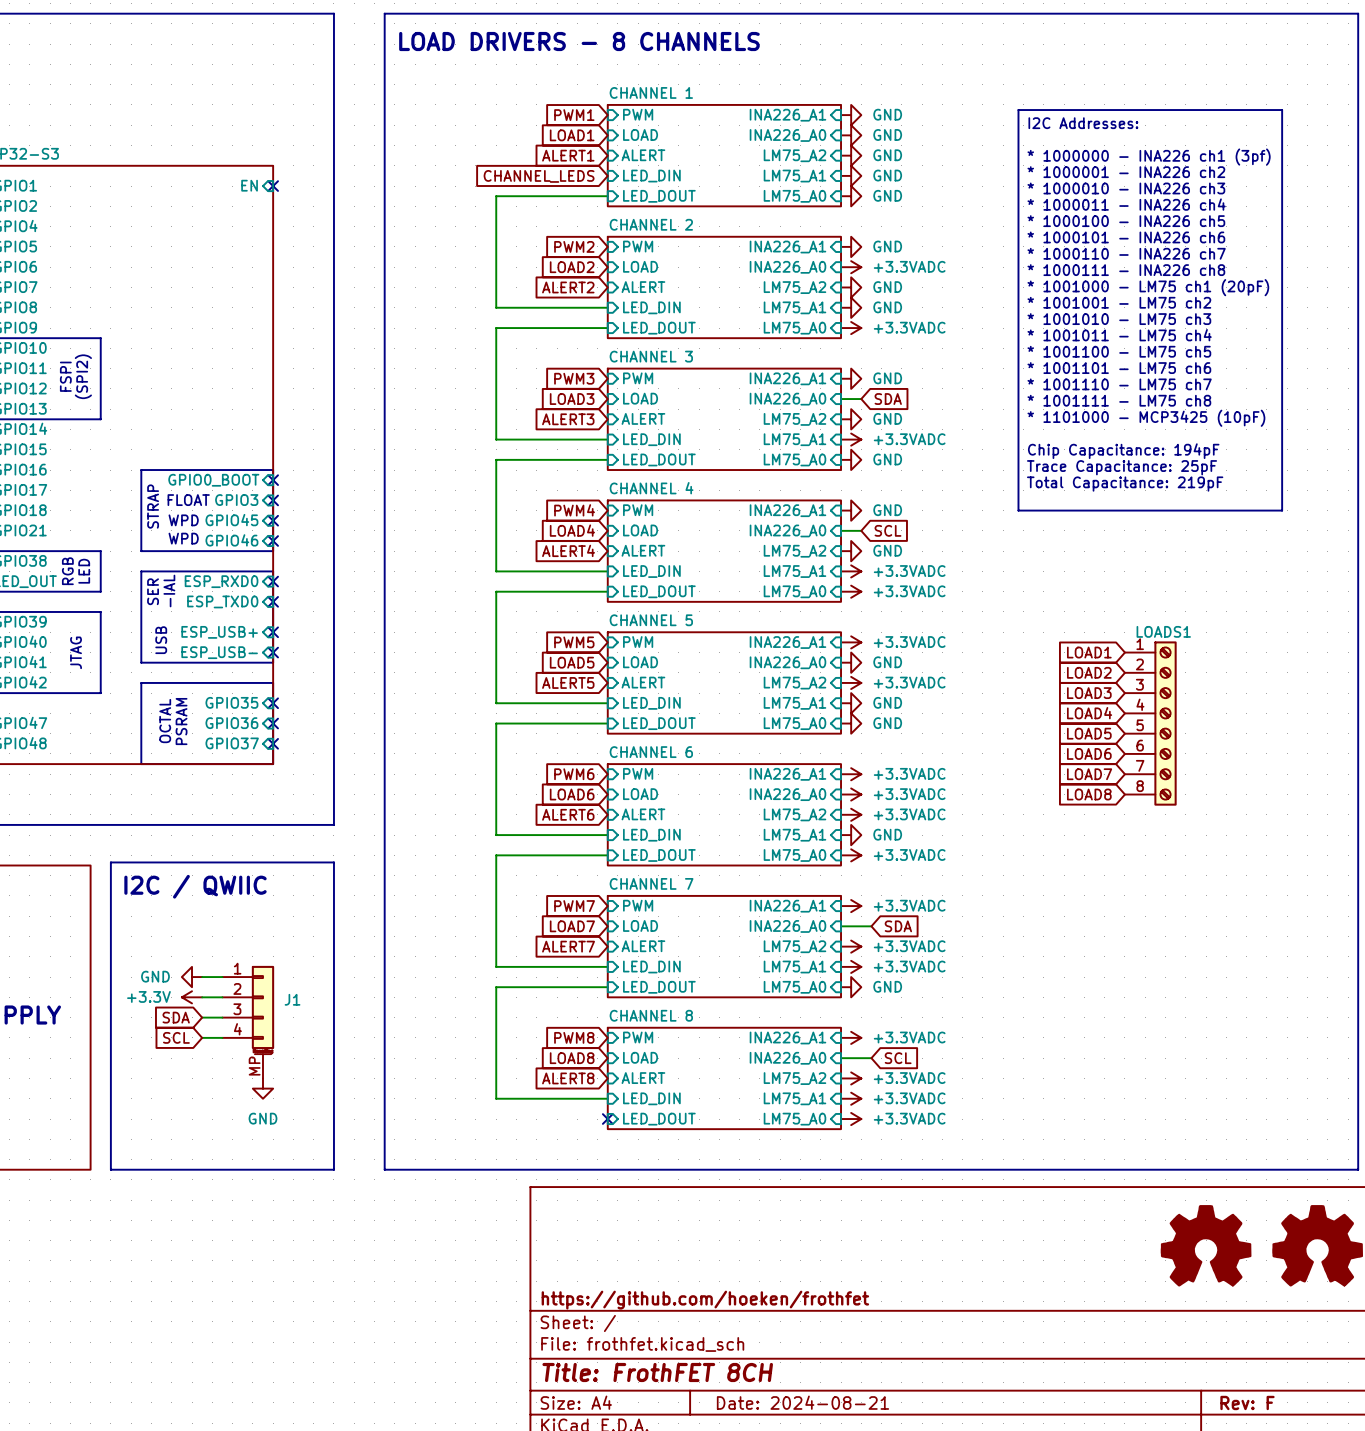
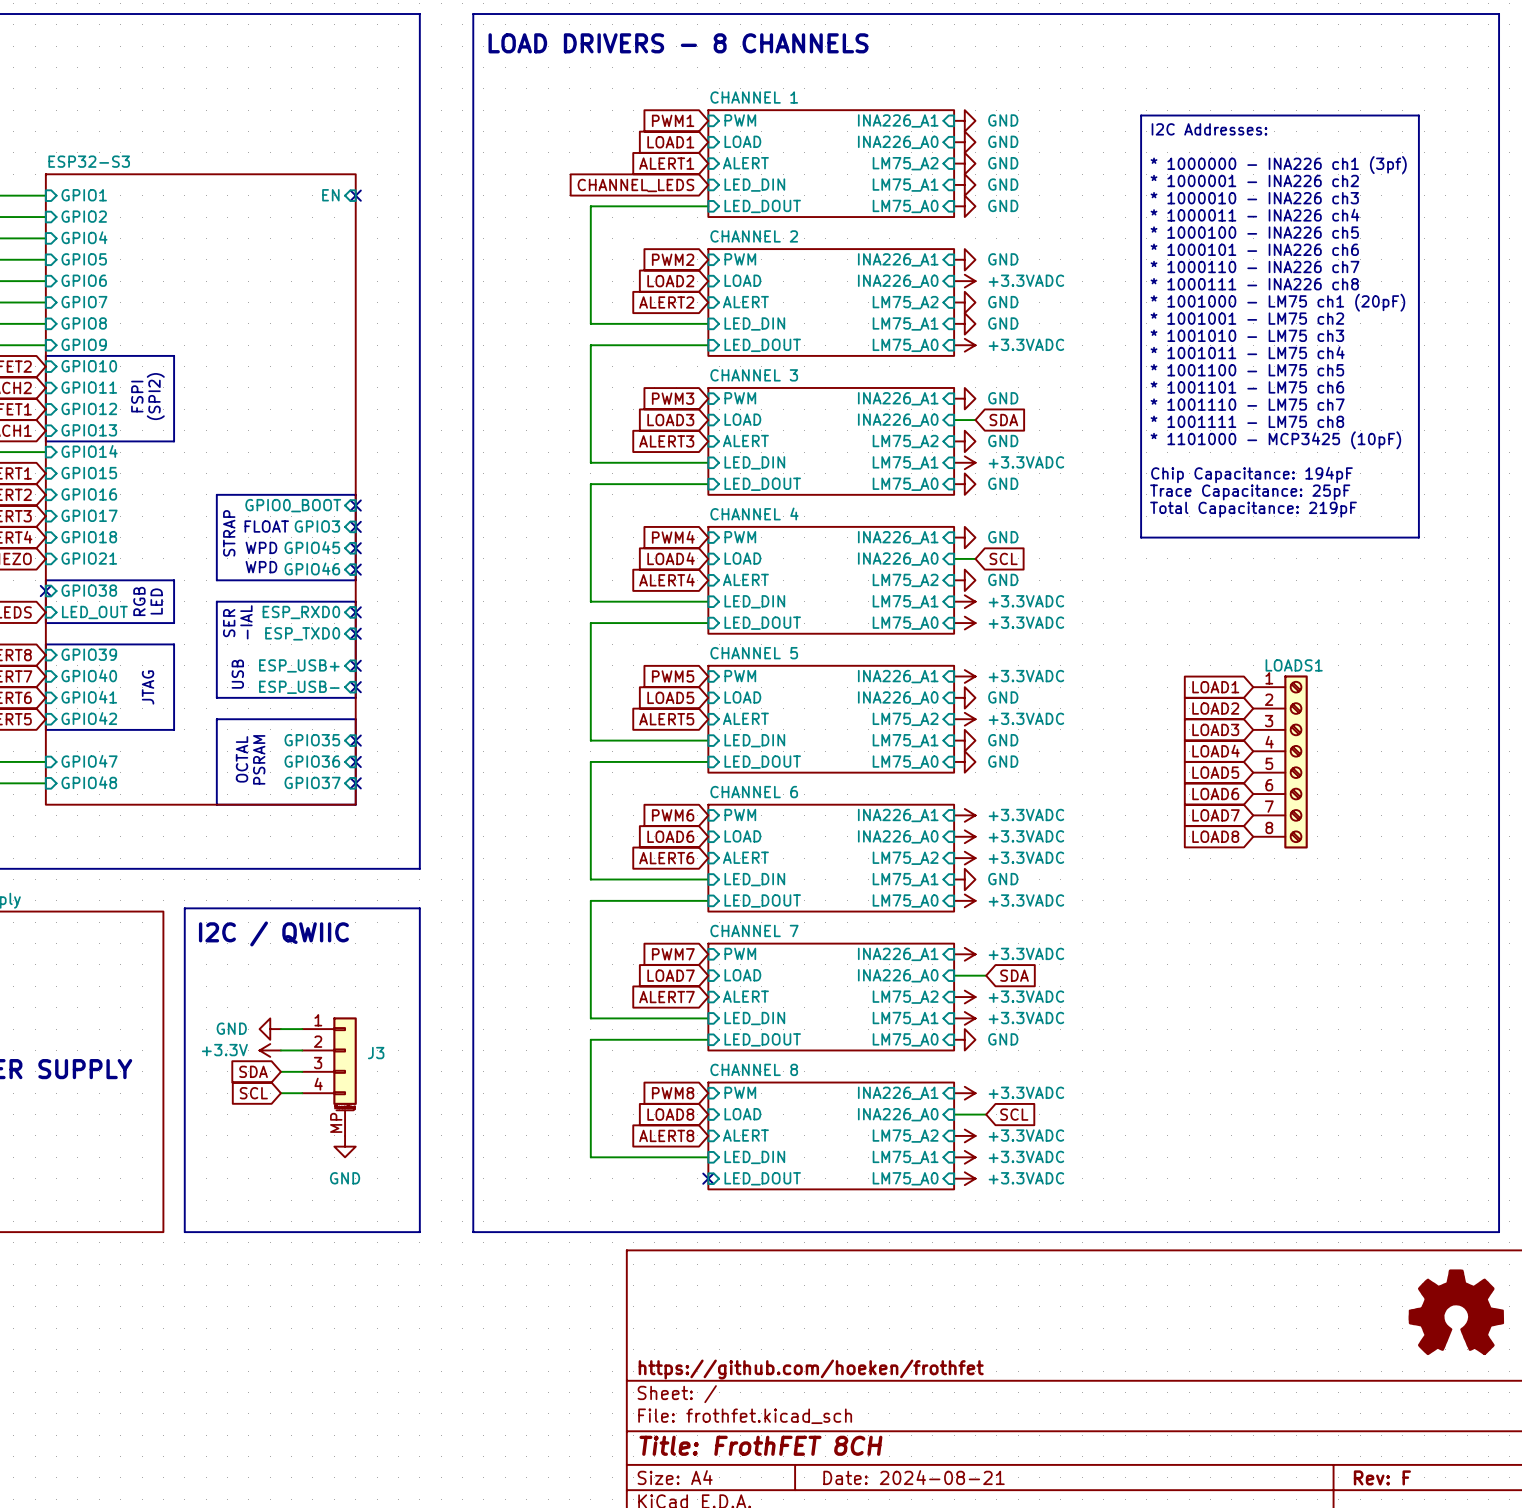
J1 name: J1 (292, 999) -> J3 (376, 1053)
part: (1206, 1245) -> none

